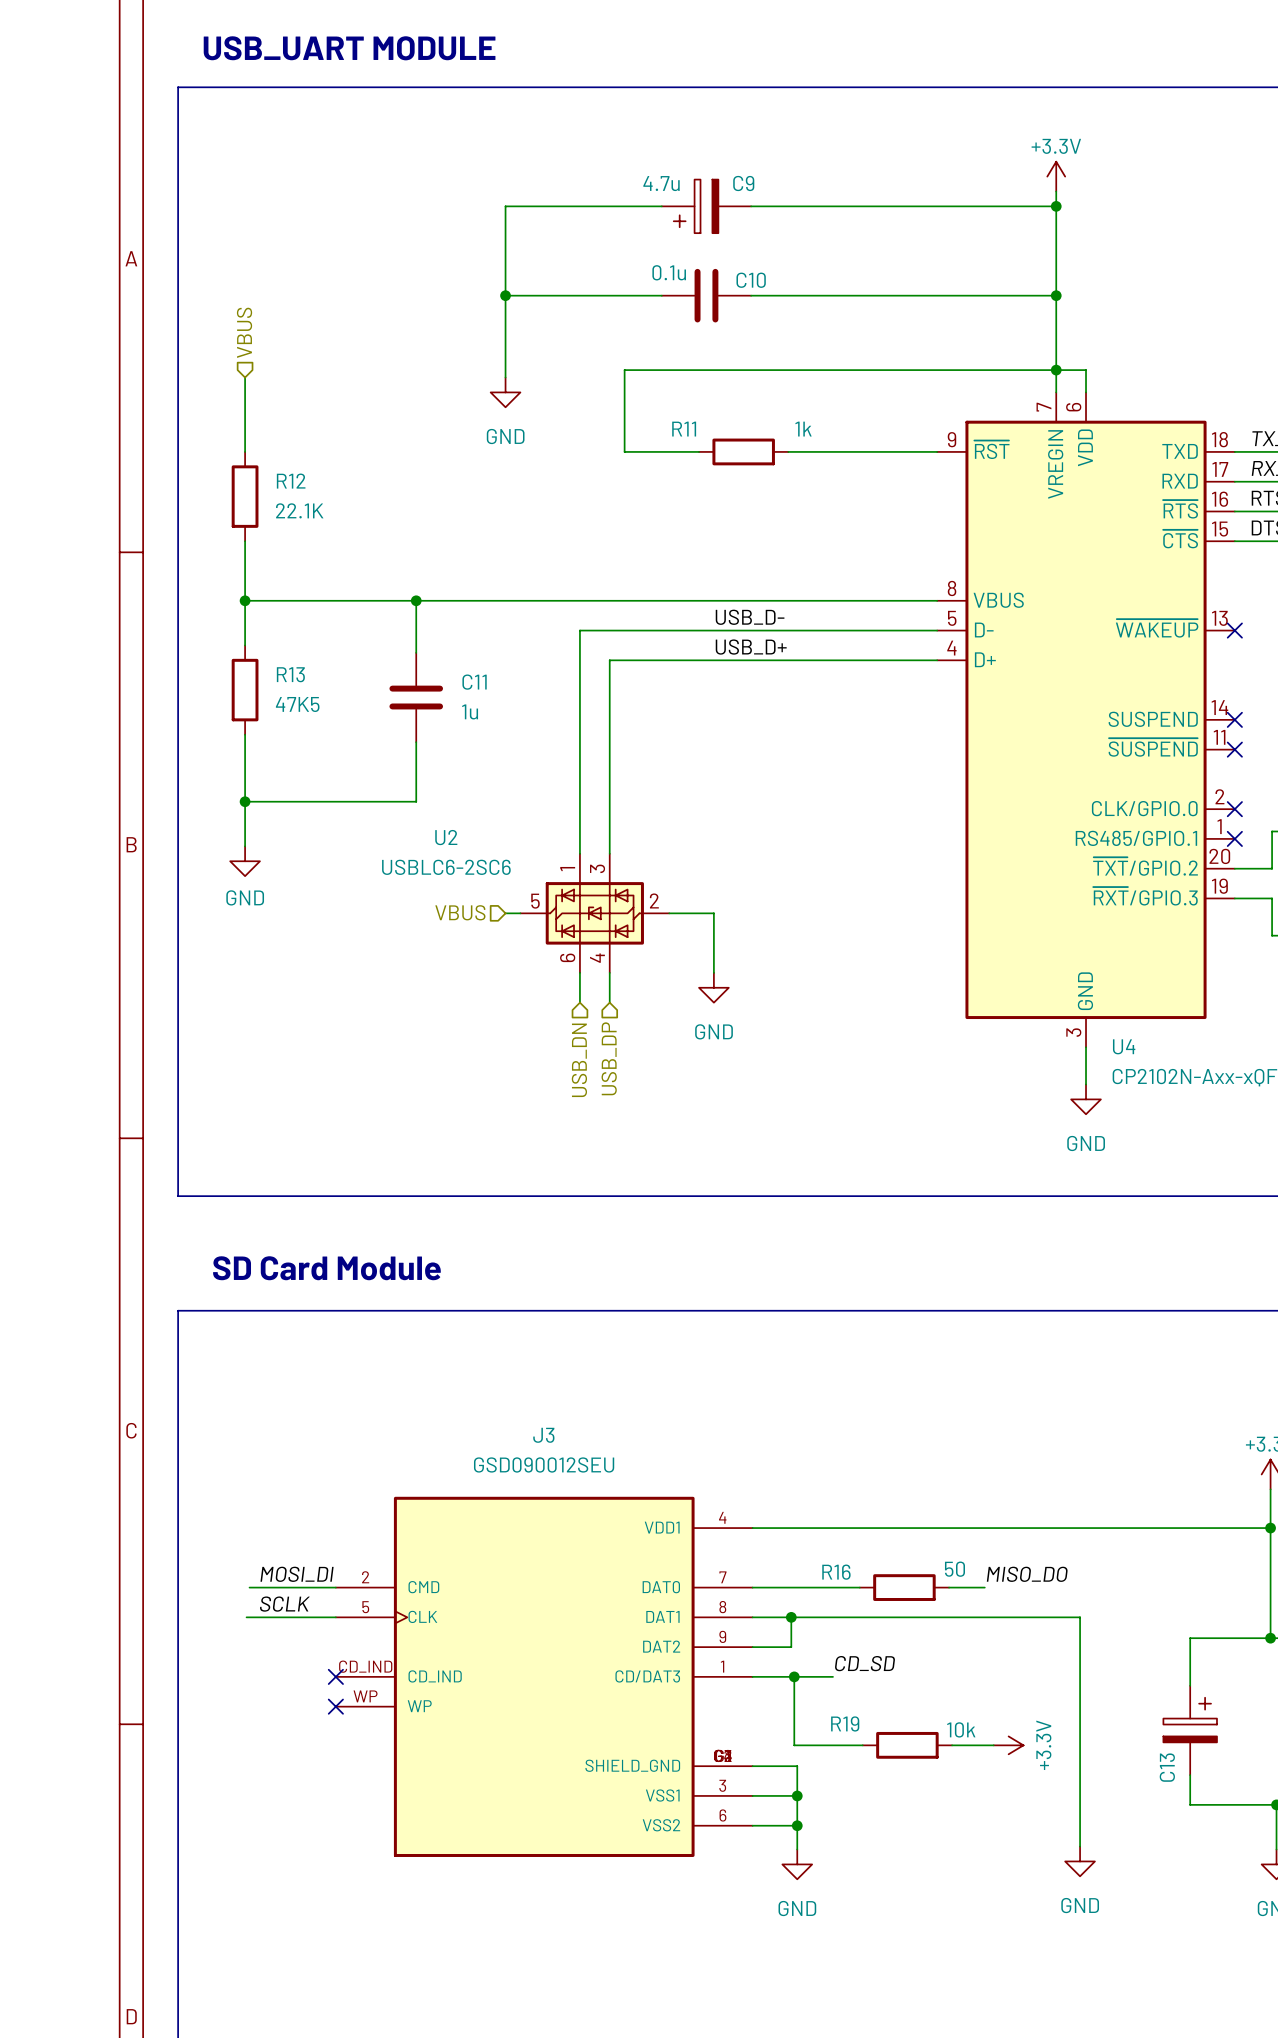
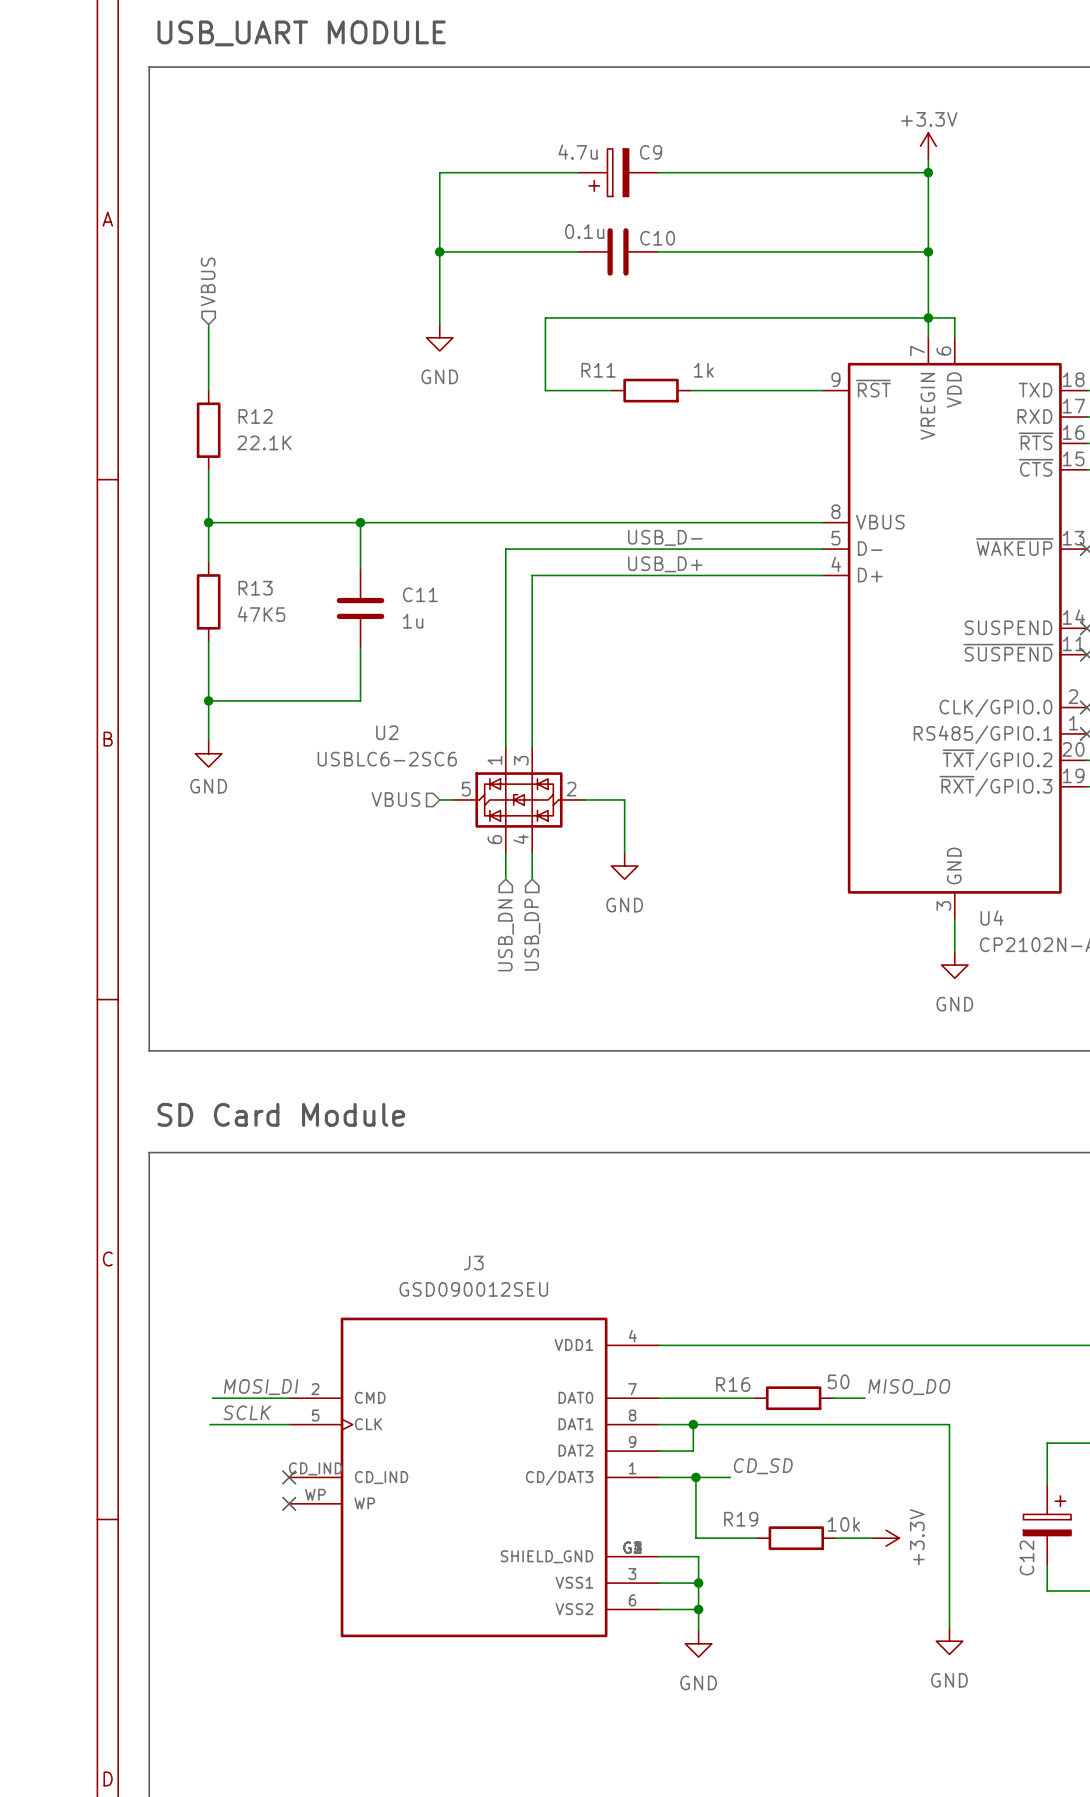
C13 name: C13 (1167, 1767) -> C12 (1026, 1557)

